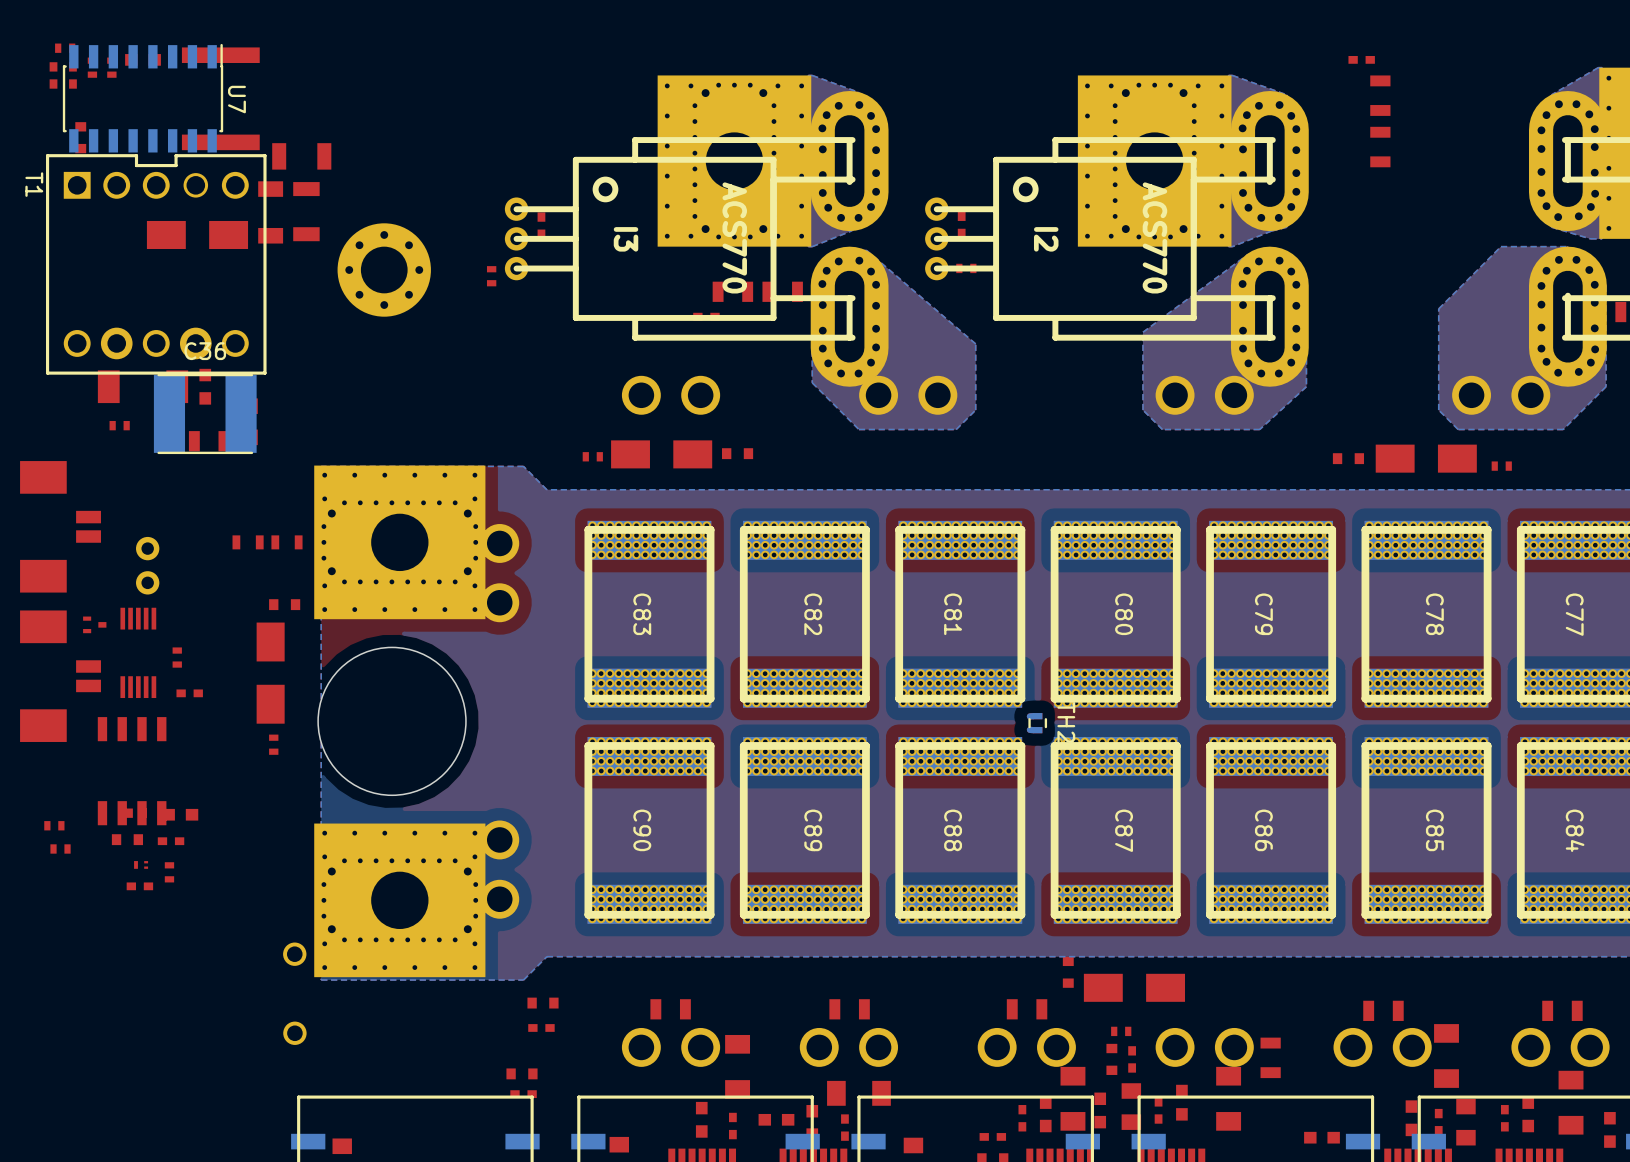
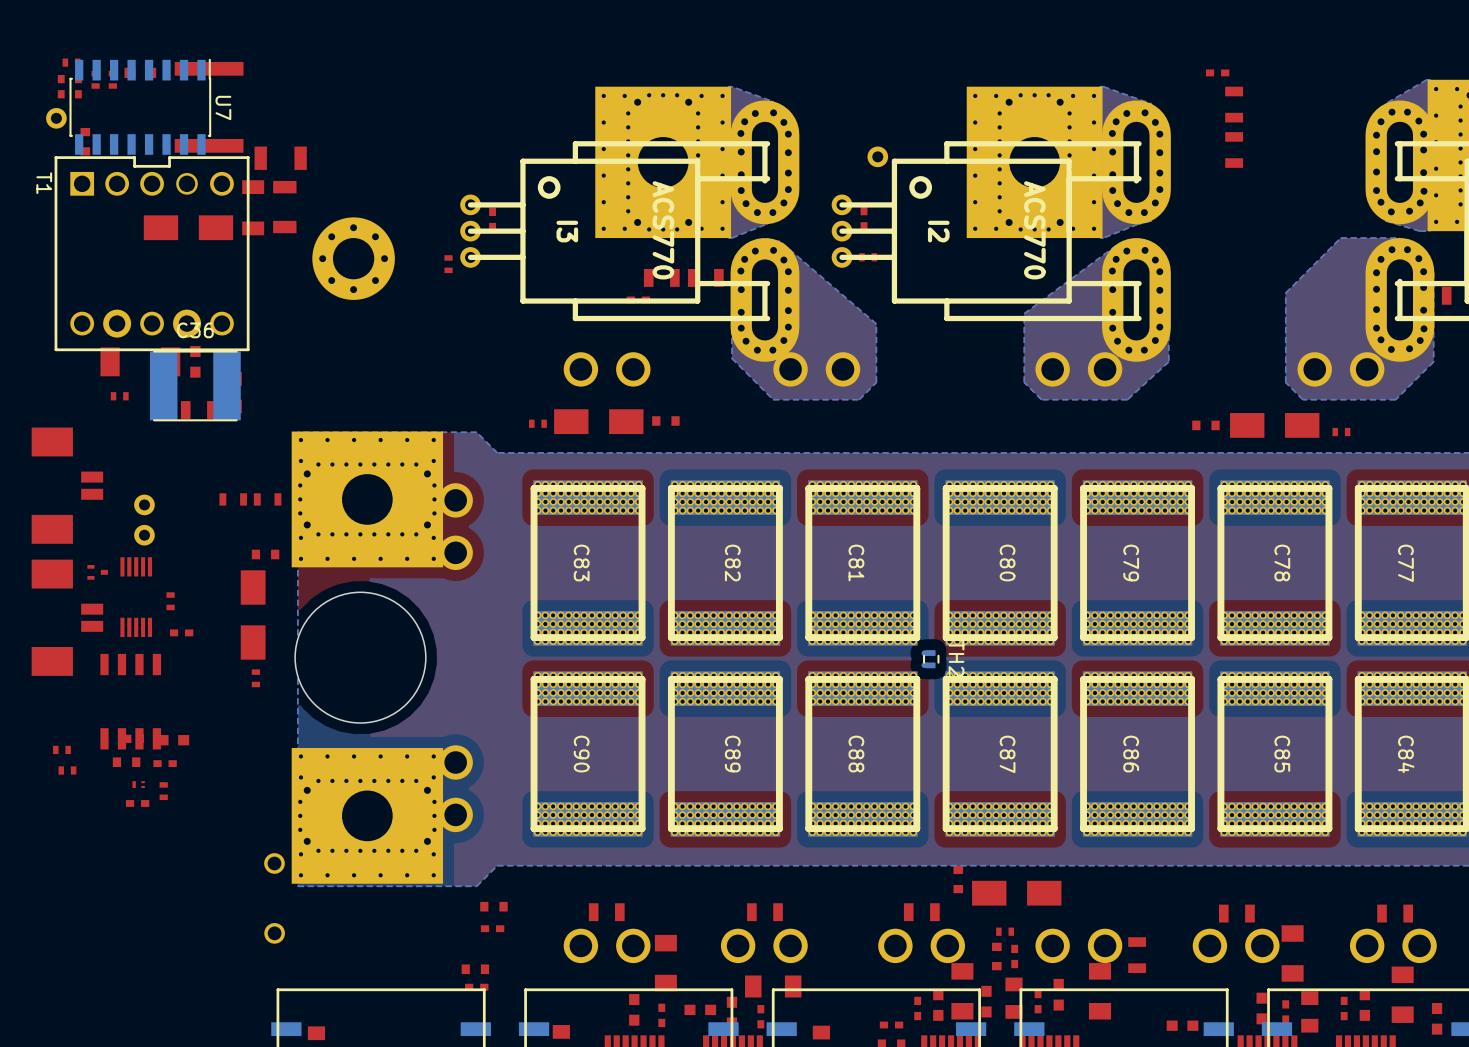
part: none -> (56, 118)
part: none -> (877, 156)

